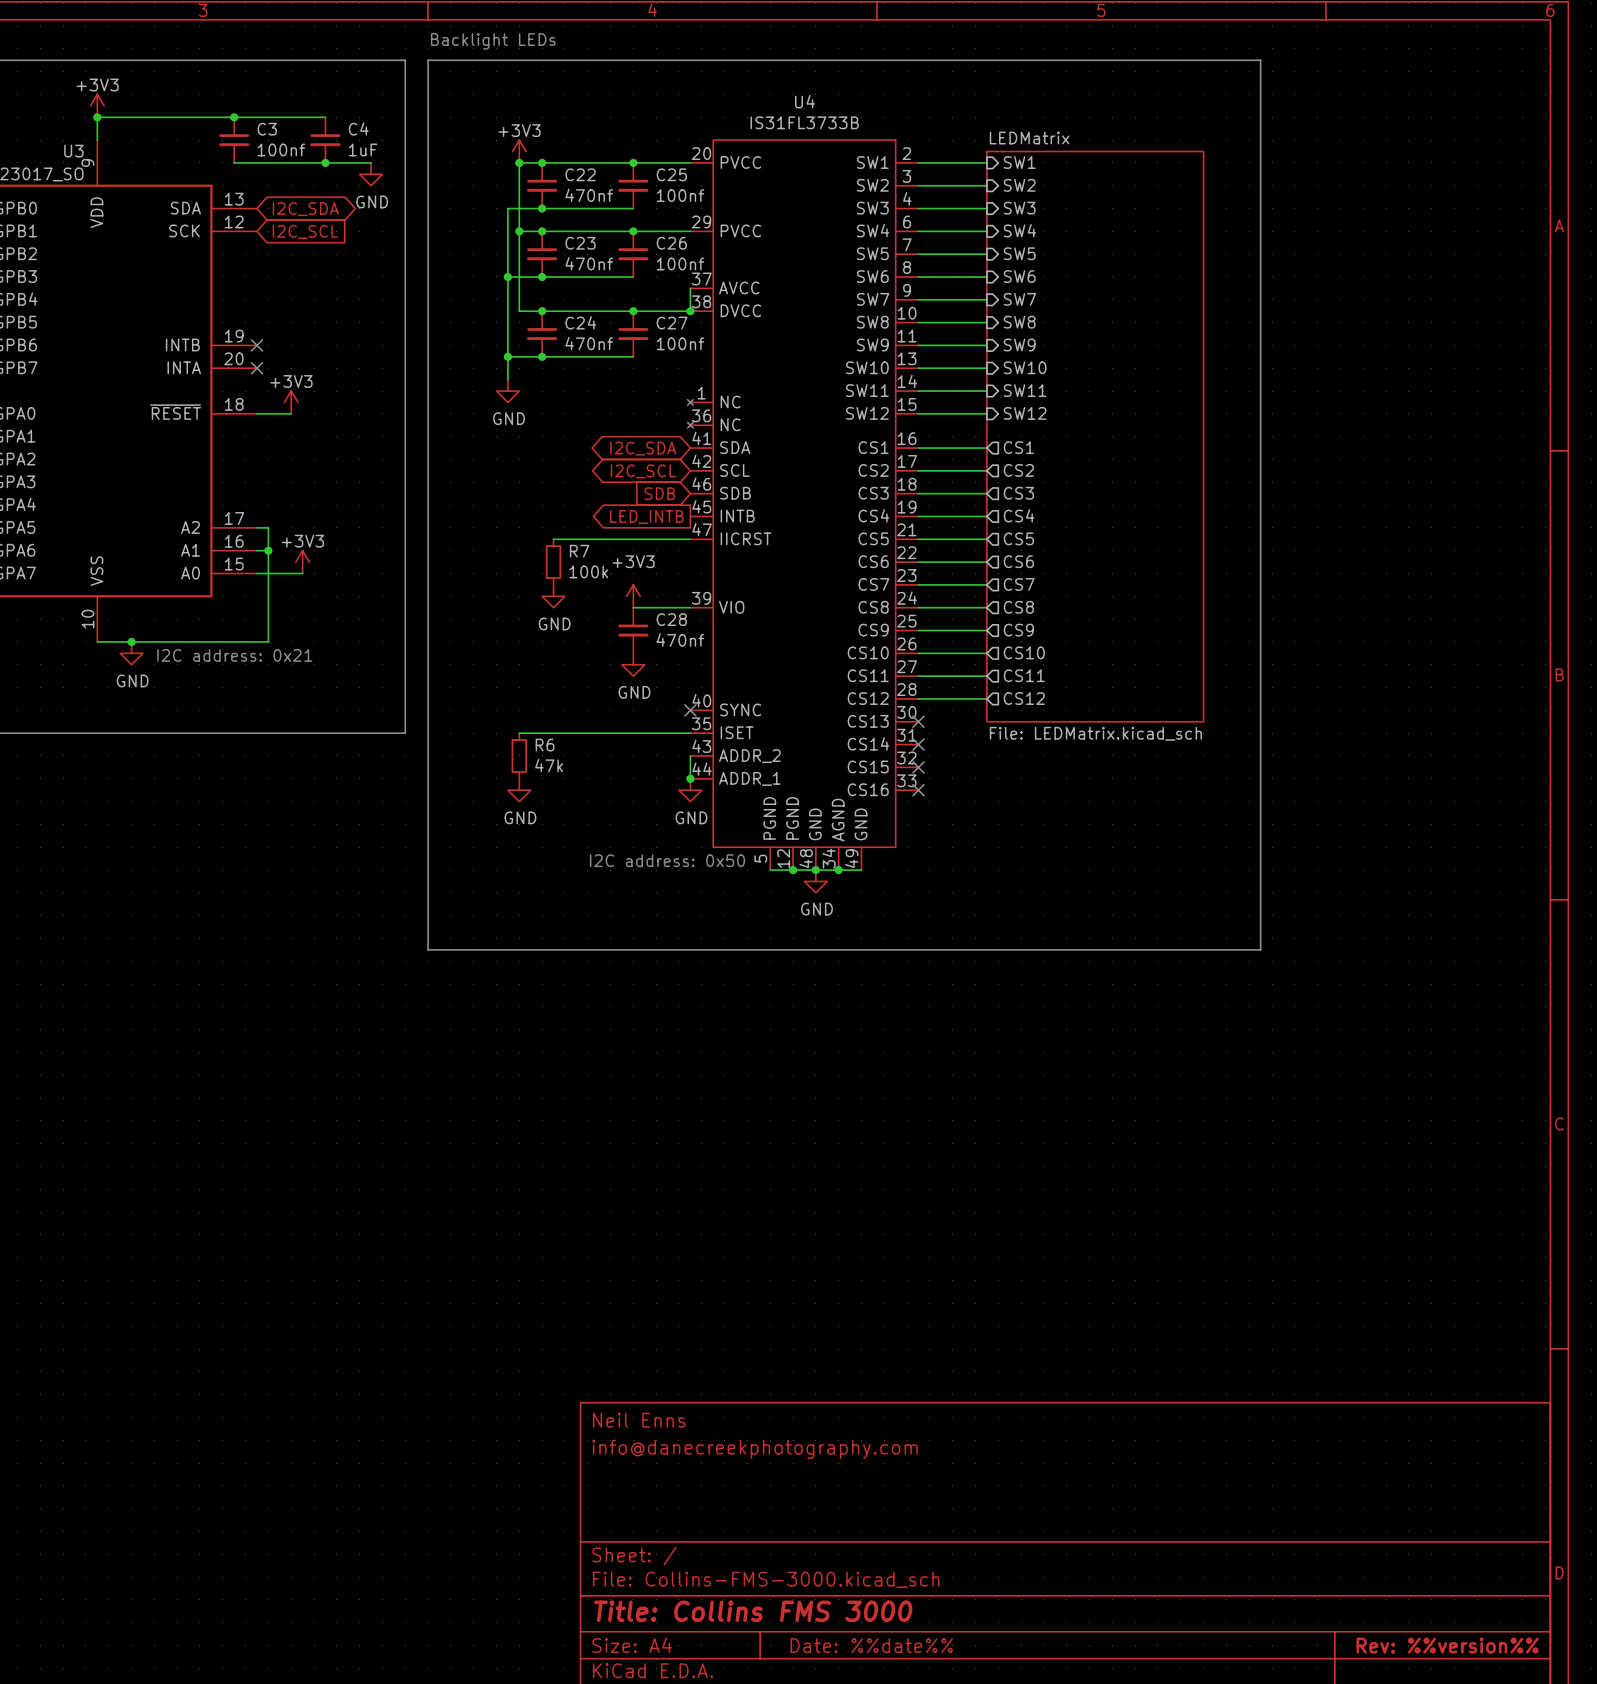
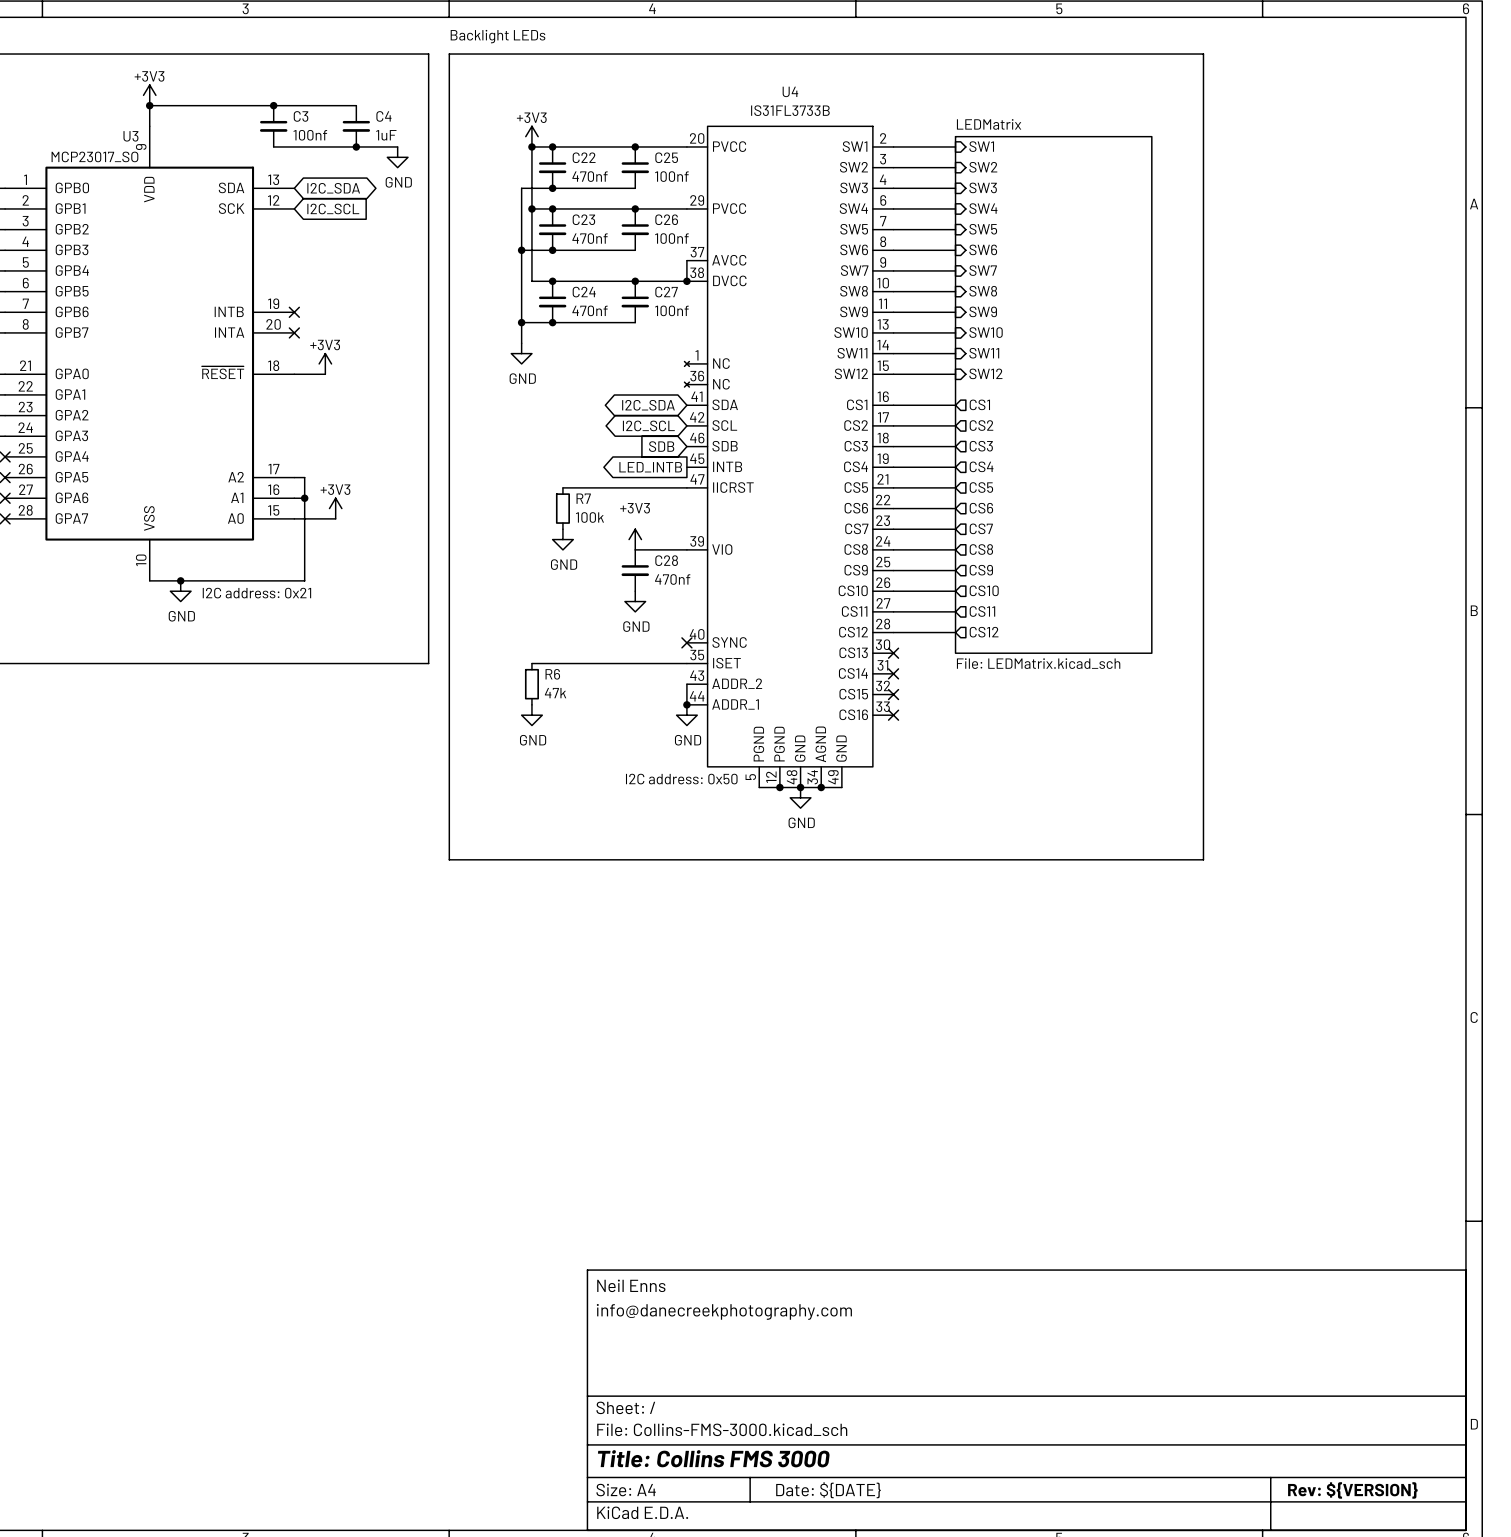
title block: Date: %%date%% (871, 1645) -> Date: ${DATE} (828, 1490)
title block: Rev: %%version%% (1447, 1645) -> Rev: ${VERSION} (1352, 1490)

